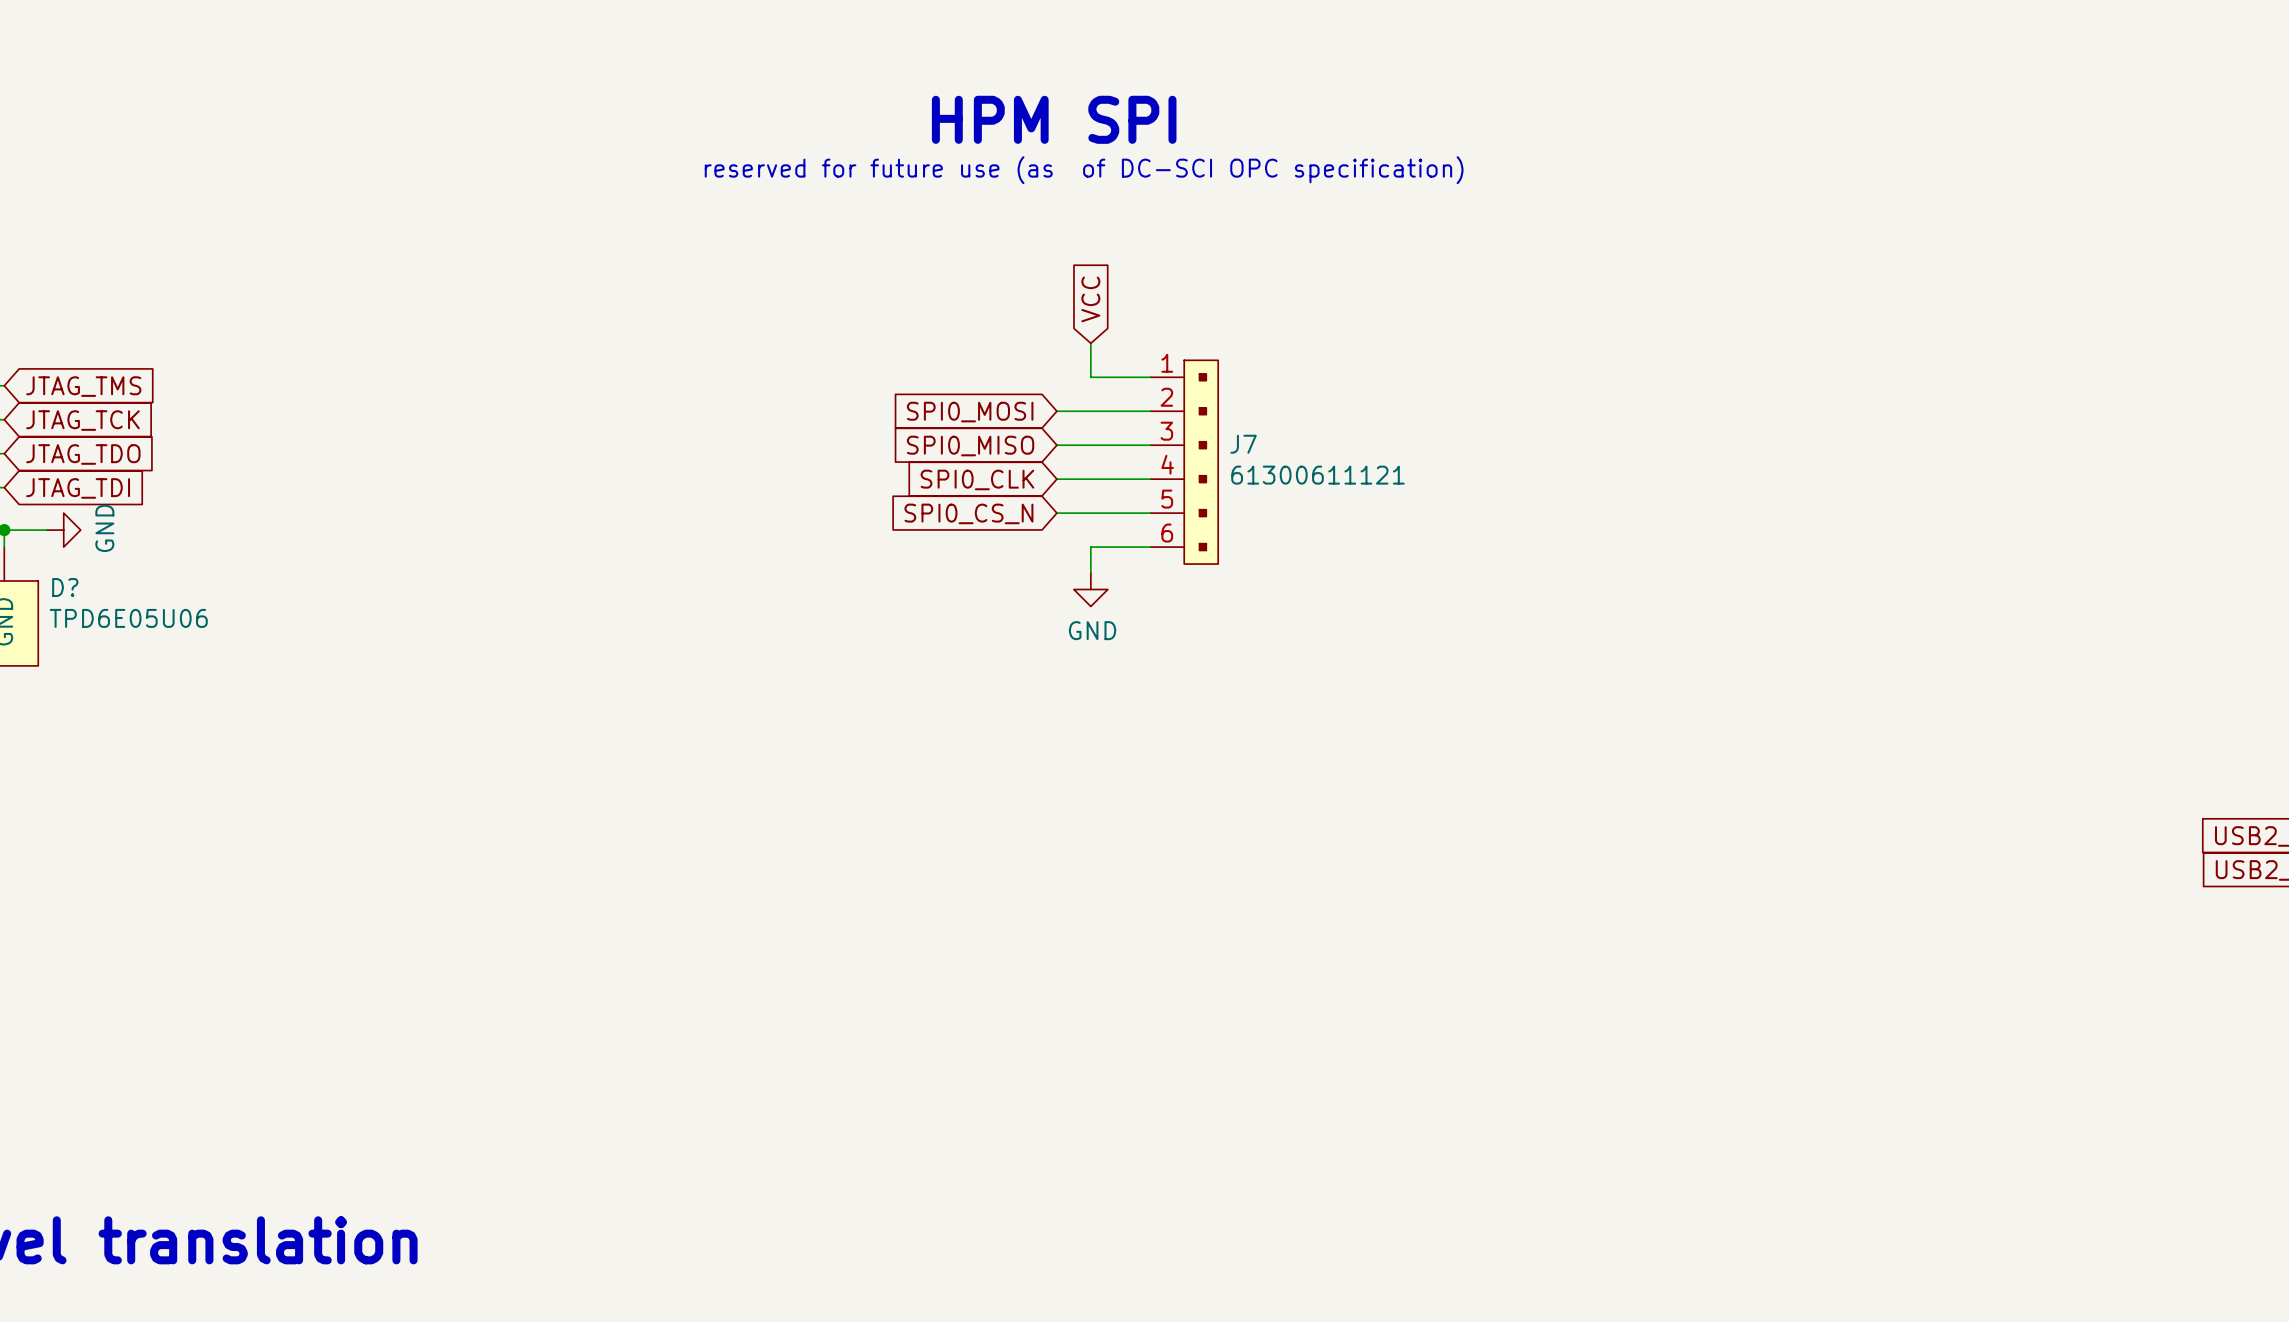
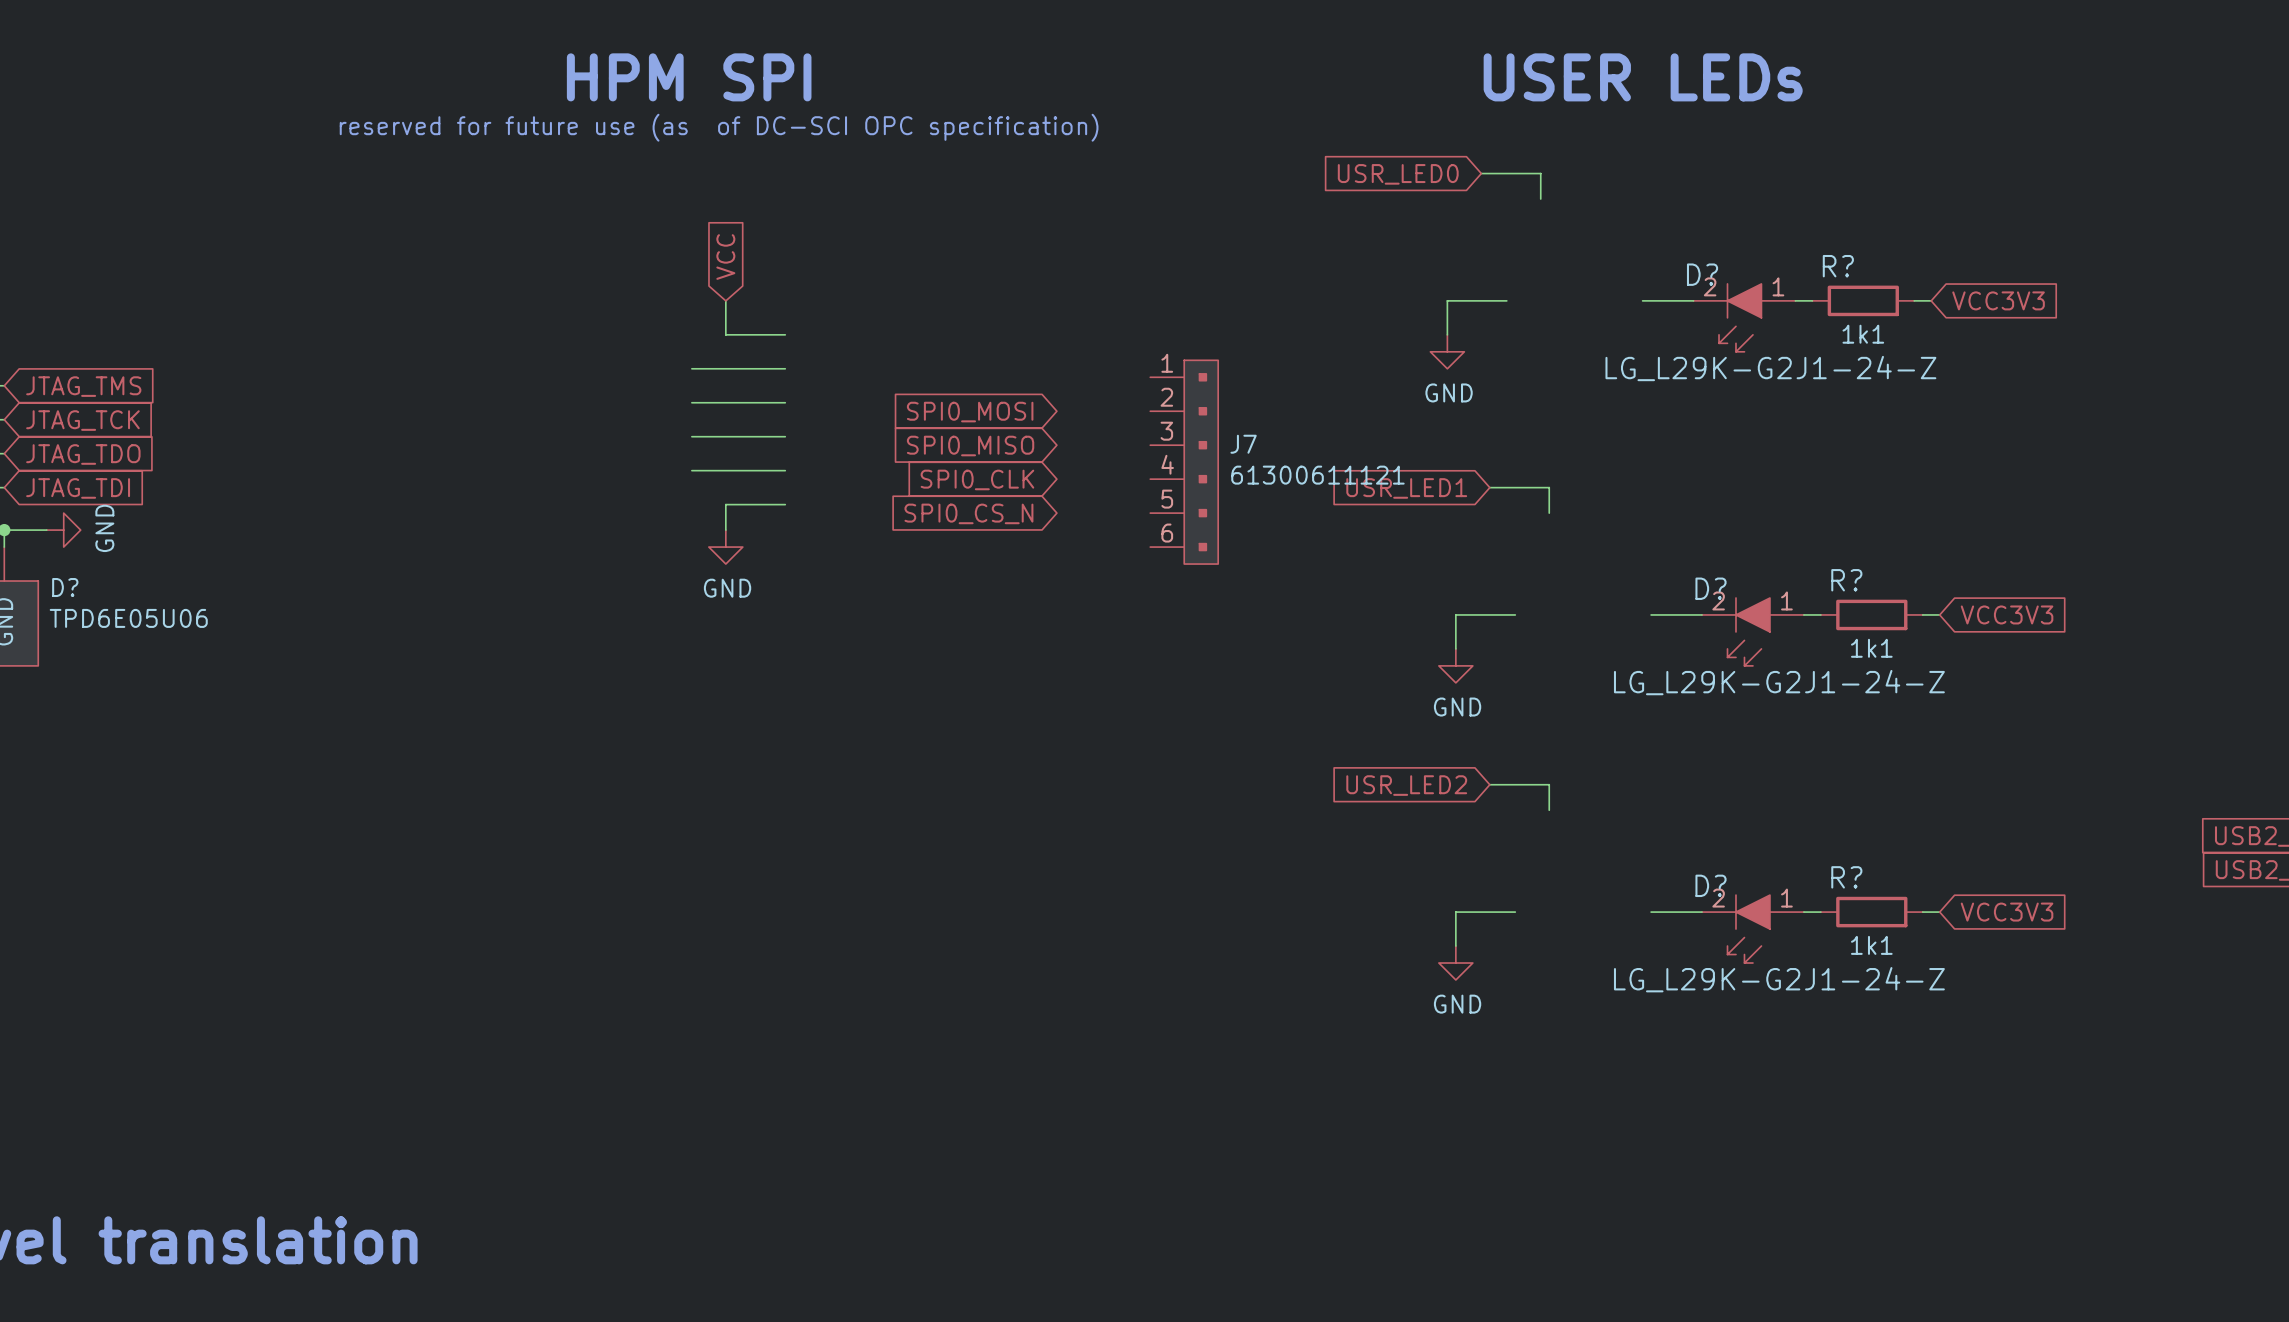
text: none -> HPM SPI (689, 77)
text: none -> USER LEDs (1643, 77)
text: HPM SPI (1054, 119) -> none
text: none -> reserved for future use (as of DC-SCI OPC specification) (719, 127)
text: reserved for future use (as of DC-SCI OPC specification) (1084, 170) -> none
wire: none -> (1481, 173) (1540, 173) (1540, 199)
global label: none -> USR_LED0 (1398, 174)
global label: none -> VCC (725, 257)
global label: VCC (1090, 299) -> none
wire: none -> (725, 300) (725, 334) (785, 334)
wire: none -> (1506, 300) (1447, 300) (1447, 334)
wire: none -> (1642, 300) (1693, 300)
wire: none -> (1795, 300) (1812, 300)
R?: none -> (1863, 300)
wire: none -> (1914, 300) (1931, 300)
global label: none -> VCC3V3 (1998, 300)
D?: none -> LG_L29K-G2J1-24-Z (1744, 317)
wire: (1090, 343) (1090, 377) (1150, 377) -> none
power symbol: none -> GND (1447, 351)
wire: none -> (691, 368) (785, 368)
wire: none -> (691, 402) (785, 402)
wire: (1056, 411) (1150, 411) -> none
wire: none -> (691, 436) (785, 436)
wire: (1056, 445) (1150, 445) -> none
wire: none -> (691, 470) (785, 470)
wire: (1056, 479) (1150, 479) -> none
wire: none -> (1489, 487) (1549, 487) (1549, 513)
global label: none -> USR_LED1 (1406, 488)
wire: none -> (785, 504) (725, 504) (725, 530)
wire: (1056, 513) (1150, 513) -> none
power symbol: none -> GND (725, 547)
wire: (1150, 547) (1090, 547) (1090, 572) -> none
power symbol: GND (1090, 589) -> none
wire: none -> (1515, 614) (1455, 614) (1455, 648)
wire: none -> (1651, 614) (1702, 614)
wire: none -> (1803, 614) (1820, 614)
R?: none -> (1871, 614)
wire: none -> (1922, 614) (1939, 614)
global label: none -> VCC3V3 (2007, 614)
D?: none -> LG_L29K-G2J1-24-Z (1752, 631)
power symbol: none -> GND (1455, 665)
wire: none -> (1489, 784) (1549, 784) (1549, 810)
global label: none -> USR_LED2 (1406, 785)
wire: none -> (1515, 912) (1455, 912) (1455, 946)
wire: none -> (1651, 912) (1702, 912)
wire: none -> (1803, 912) (1820, 912)
R?: none -> (1871, 912)
wire: none -> (1922, 912) (1939, 912)
global label: none -> VCC3V3 (2007, 912)
D?: none -> LG_L29K-G2J1-24-Z (1752, 929)
power symbol: none -> GND (1455, 963)

